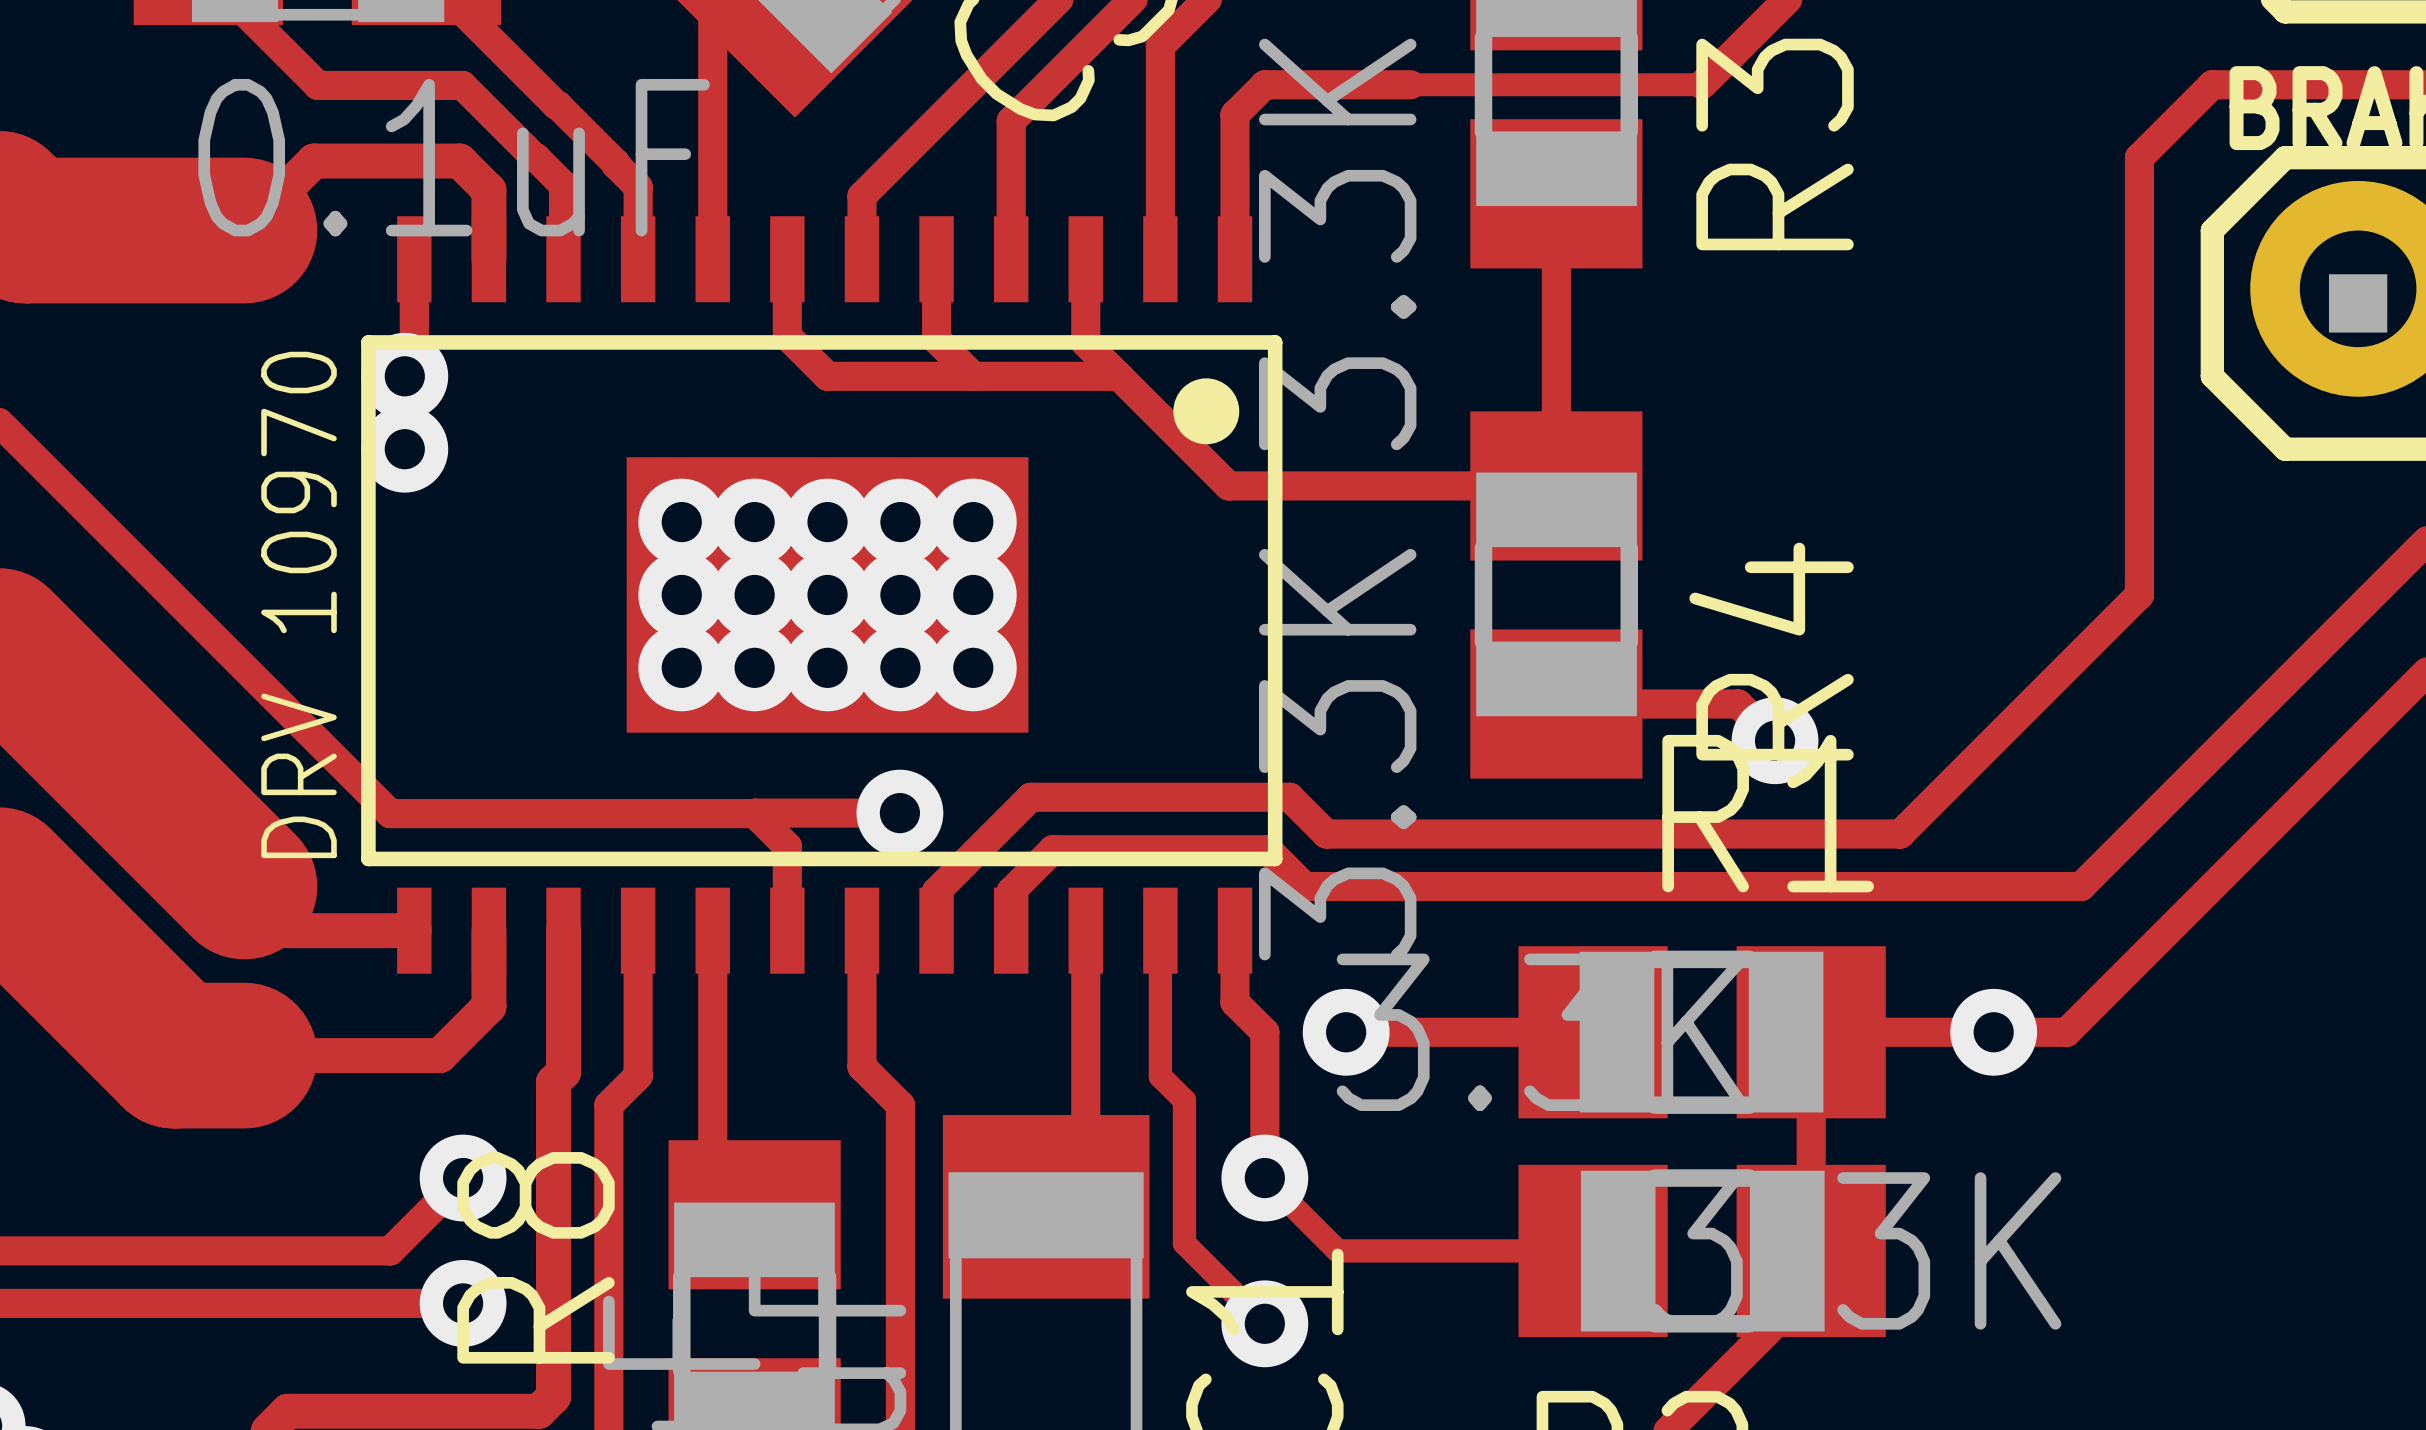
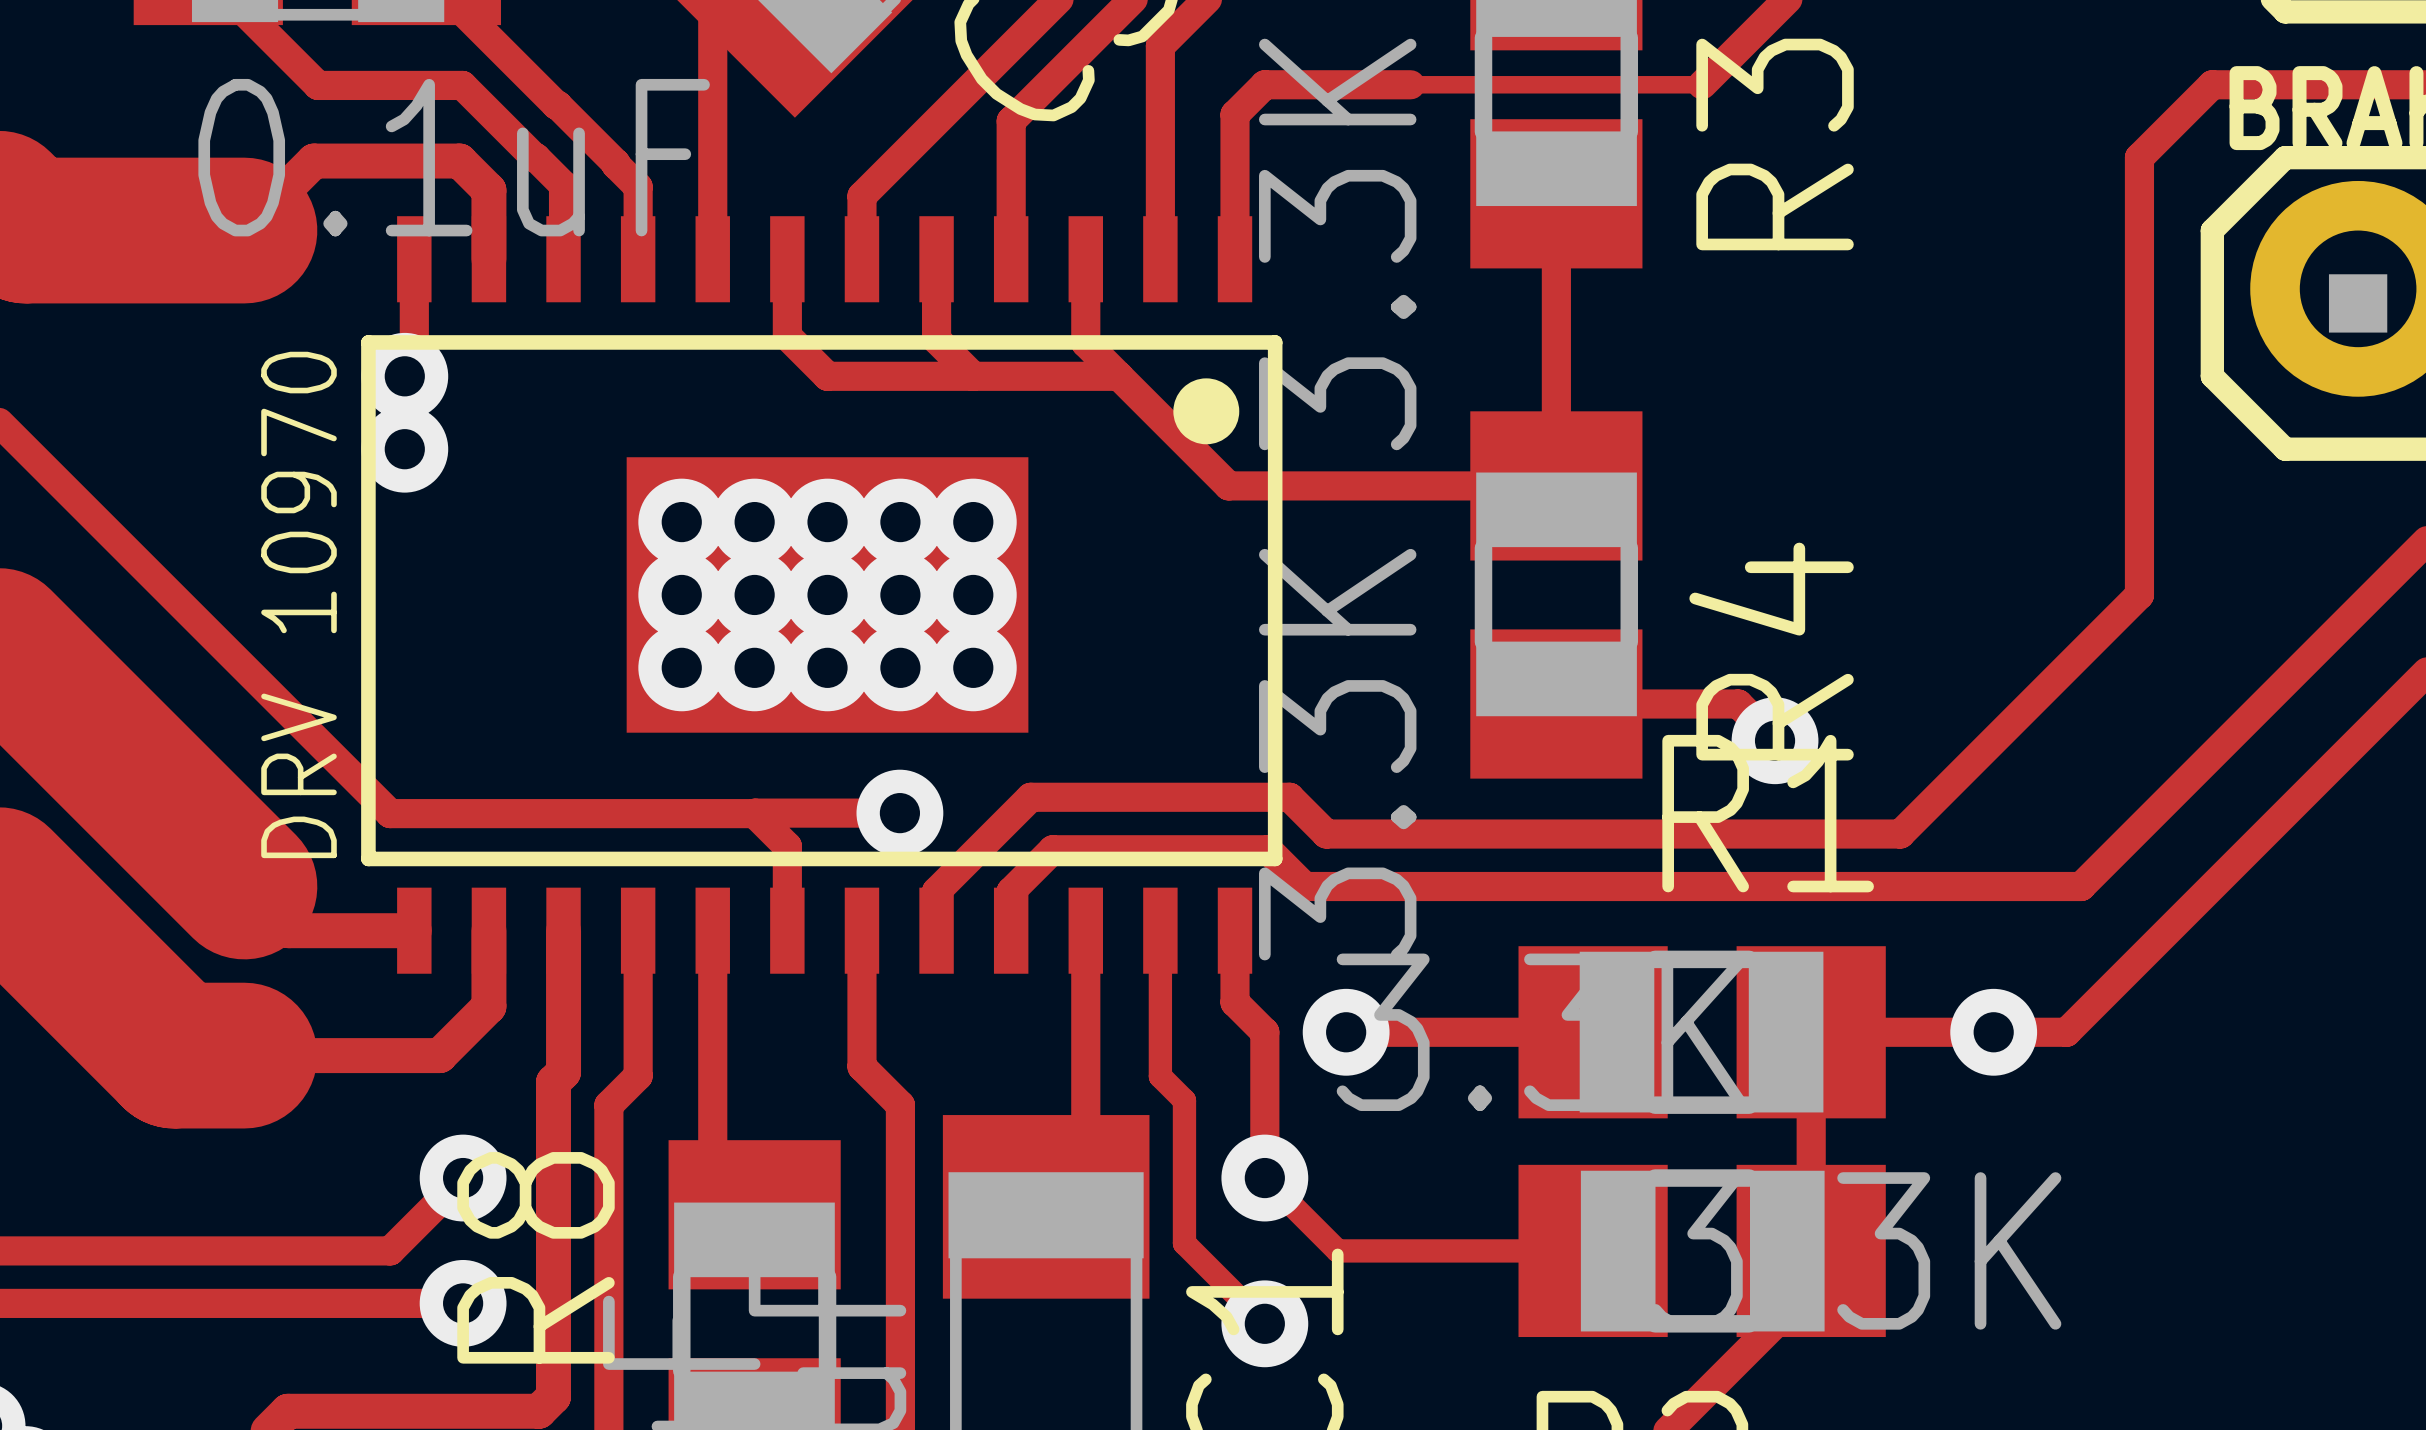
track width: thick (1410, 84) (1702, 84) -> thin (1410, 84) (1702, 84)

